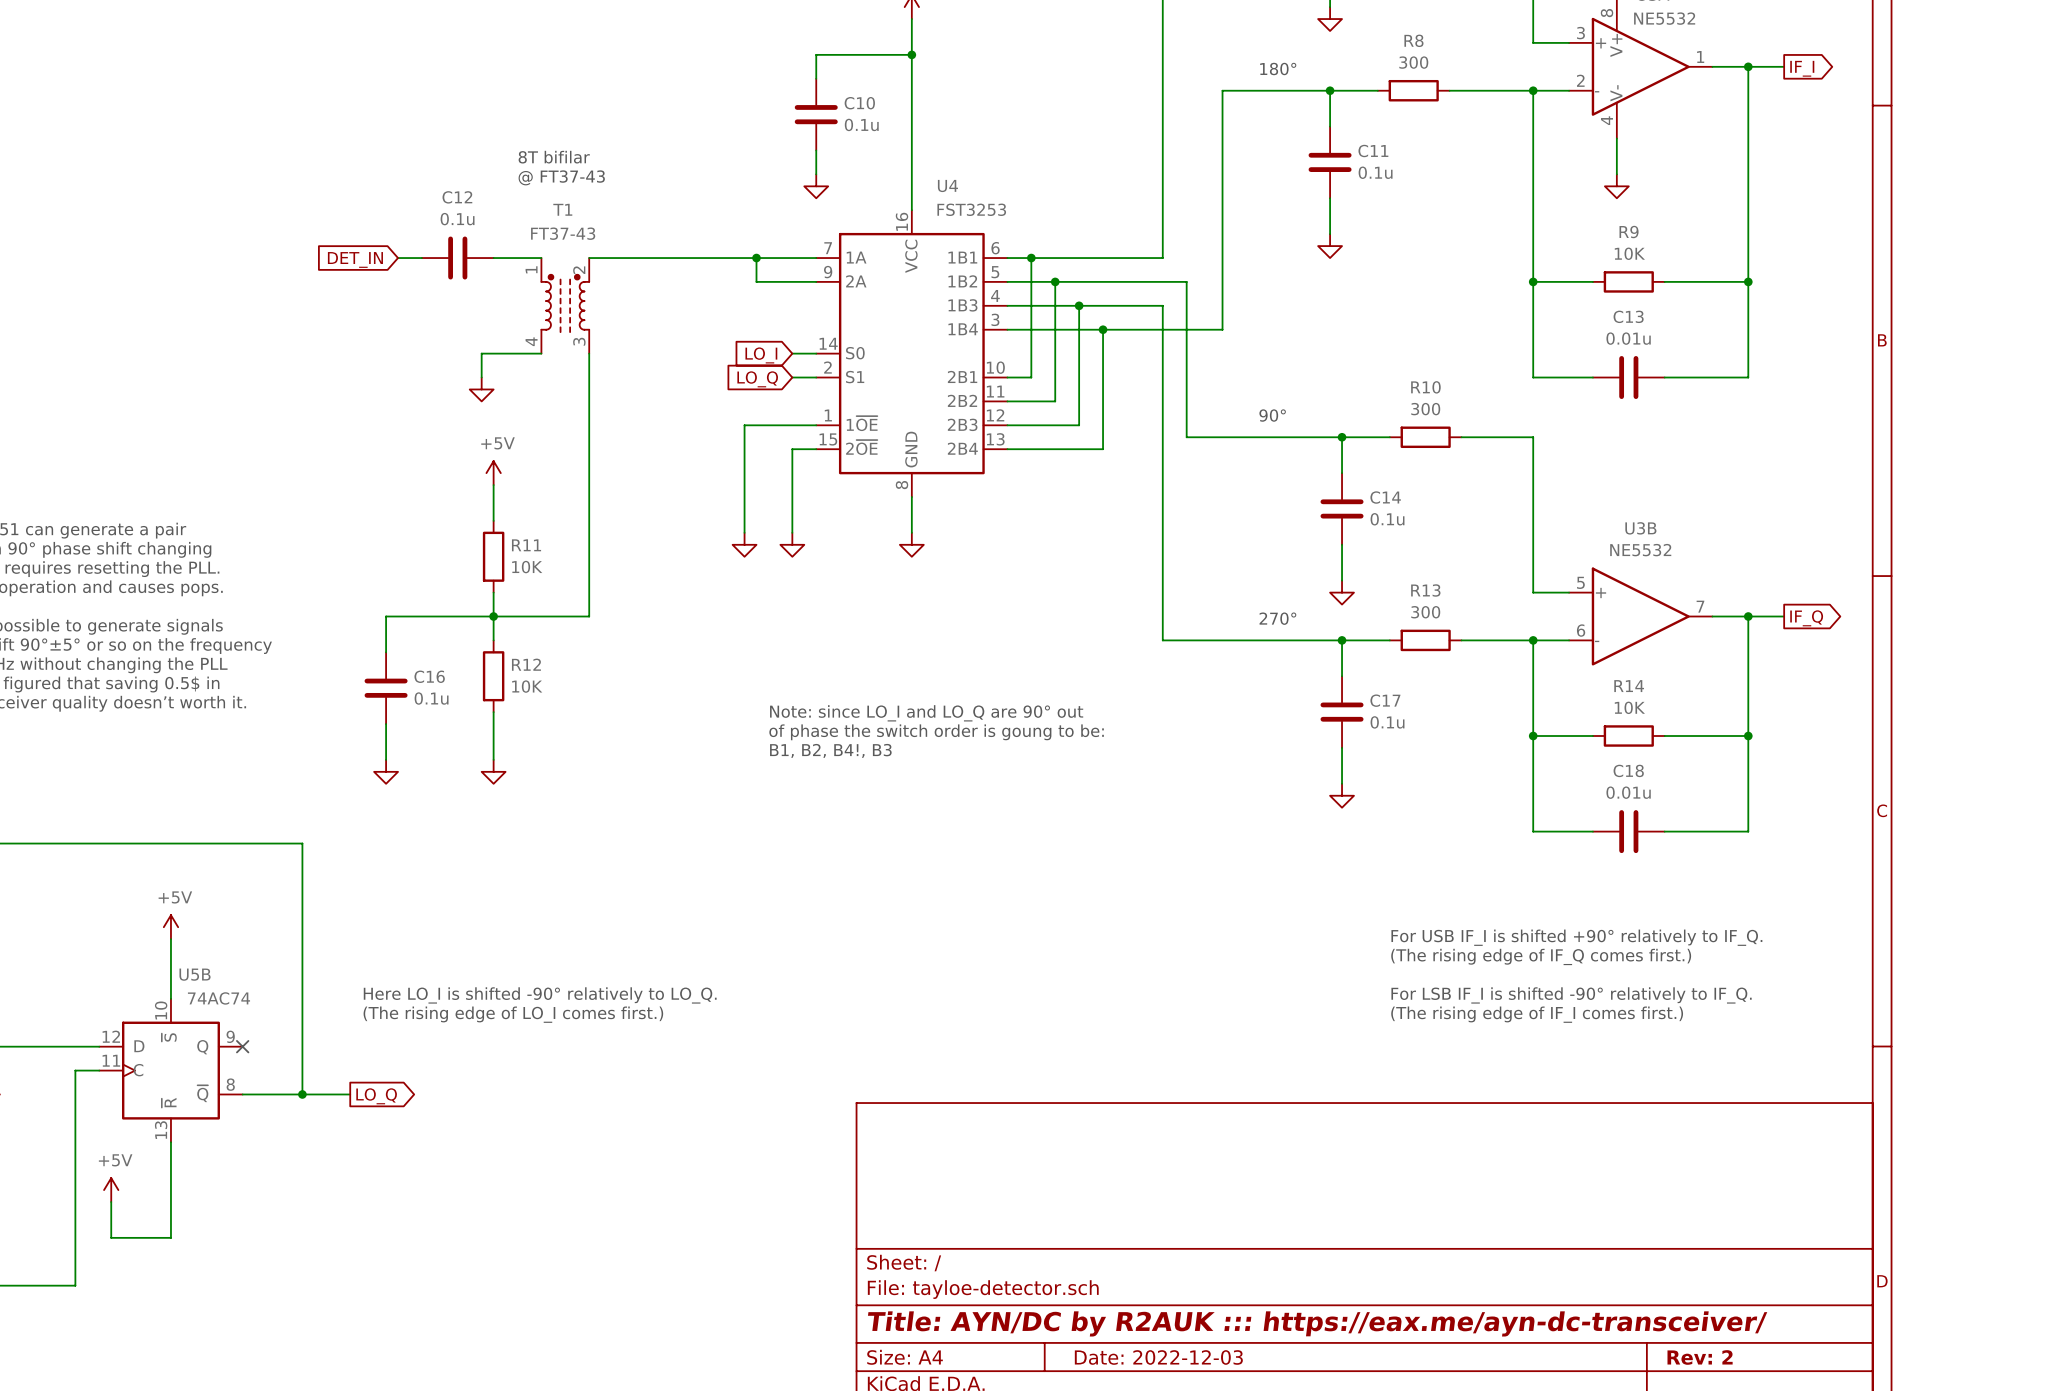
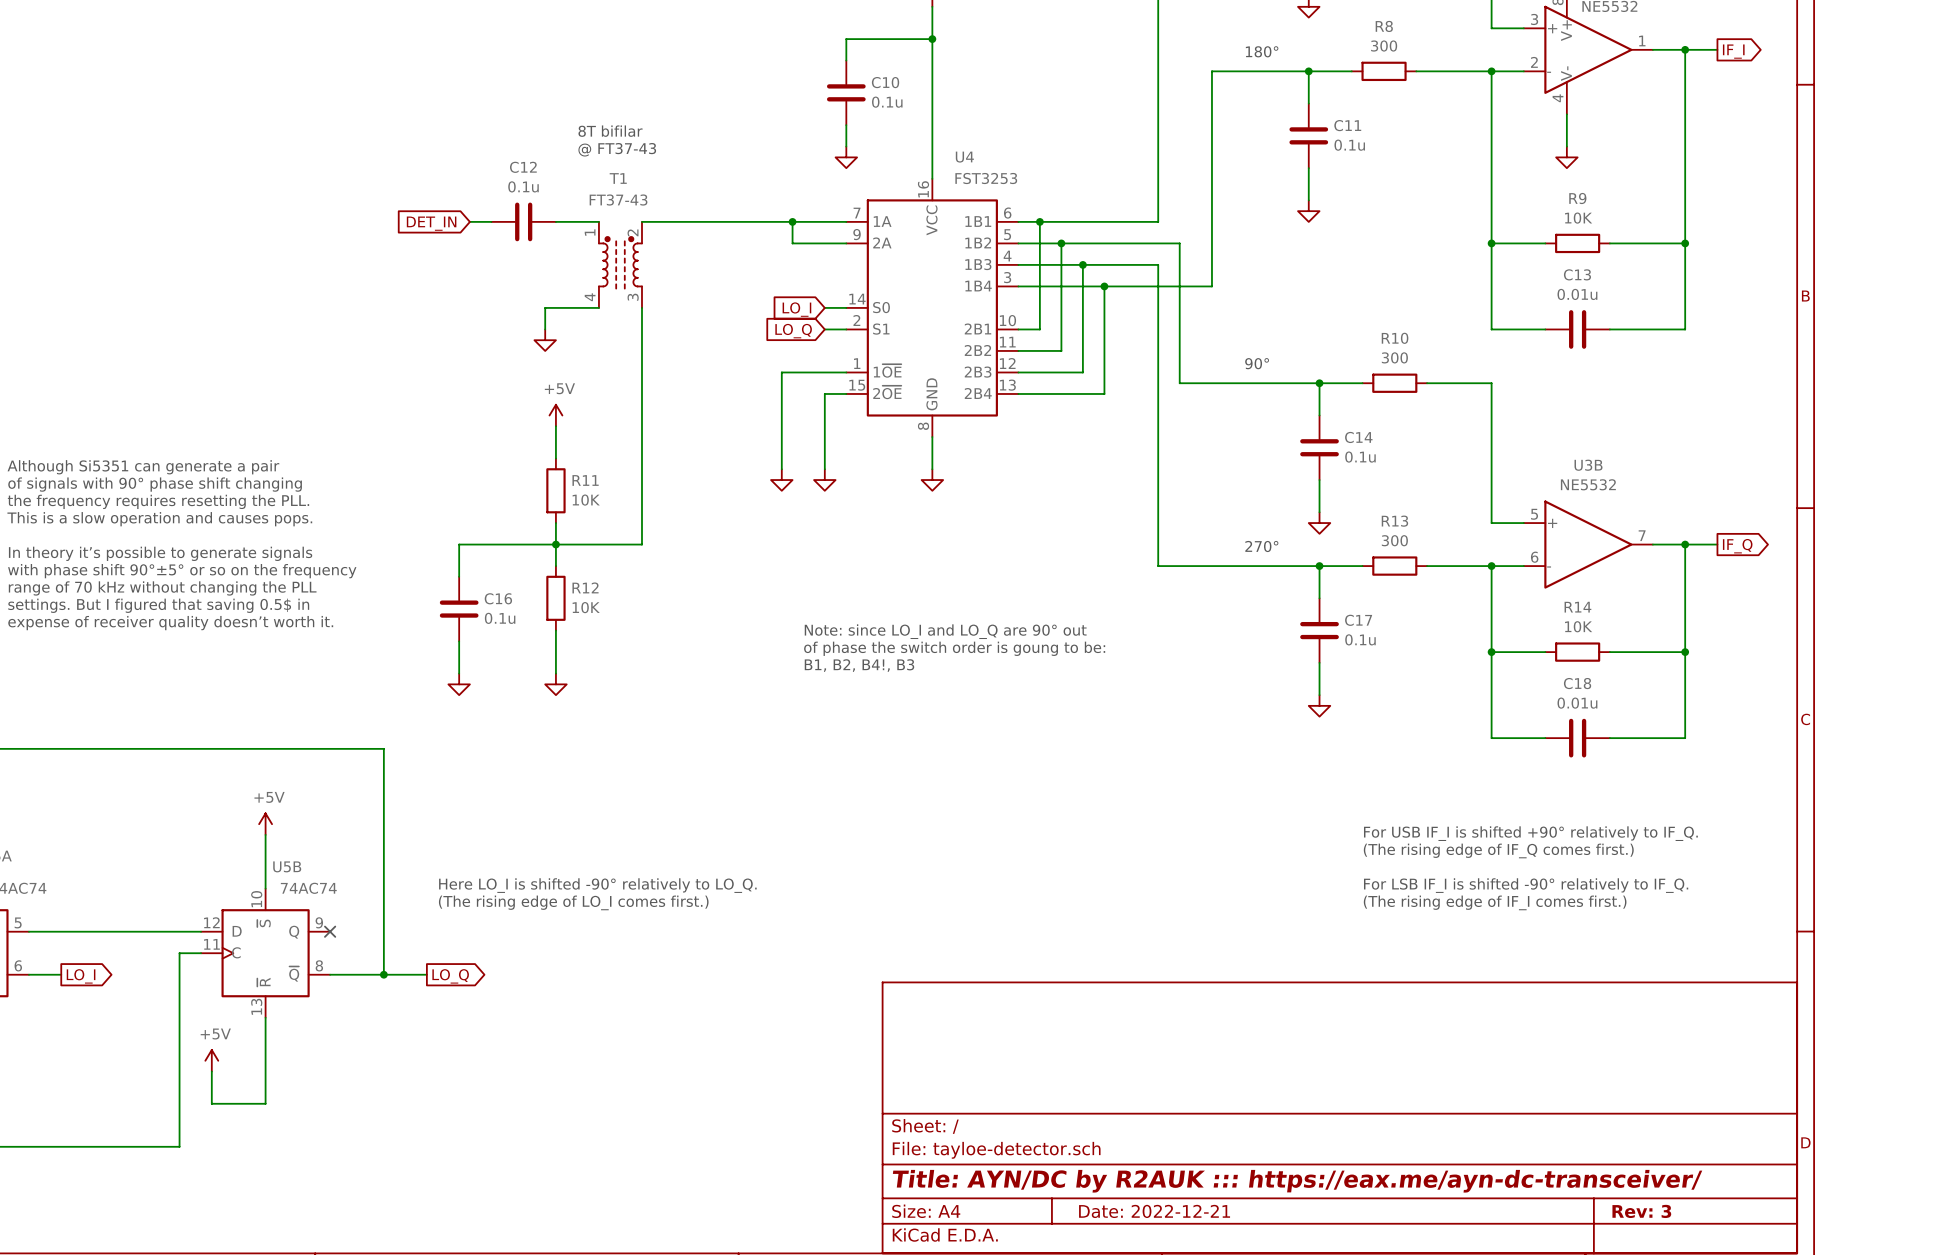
title block: Date: 2022-12-03 (1158, 1357) -> Date: 2022-12-21 (1154, 1211)
title block: Rev: 2 (1700, 1357) -> Rev: 3 (1641, 1211)

